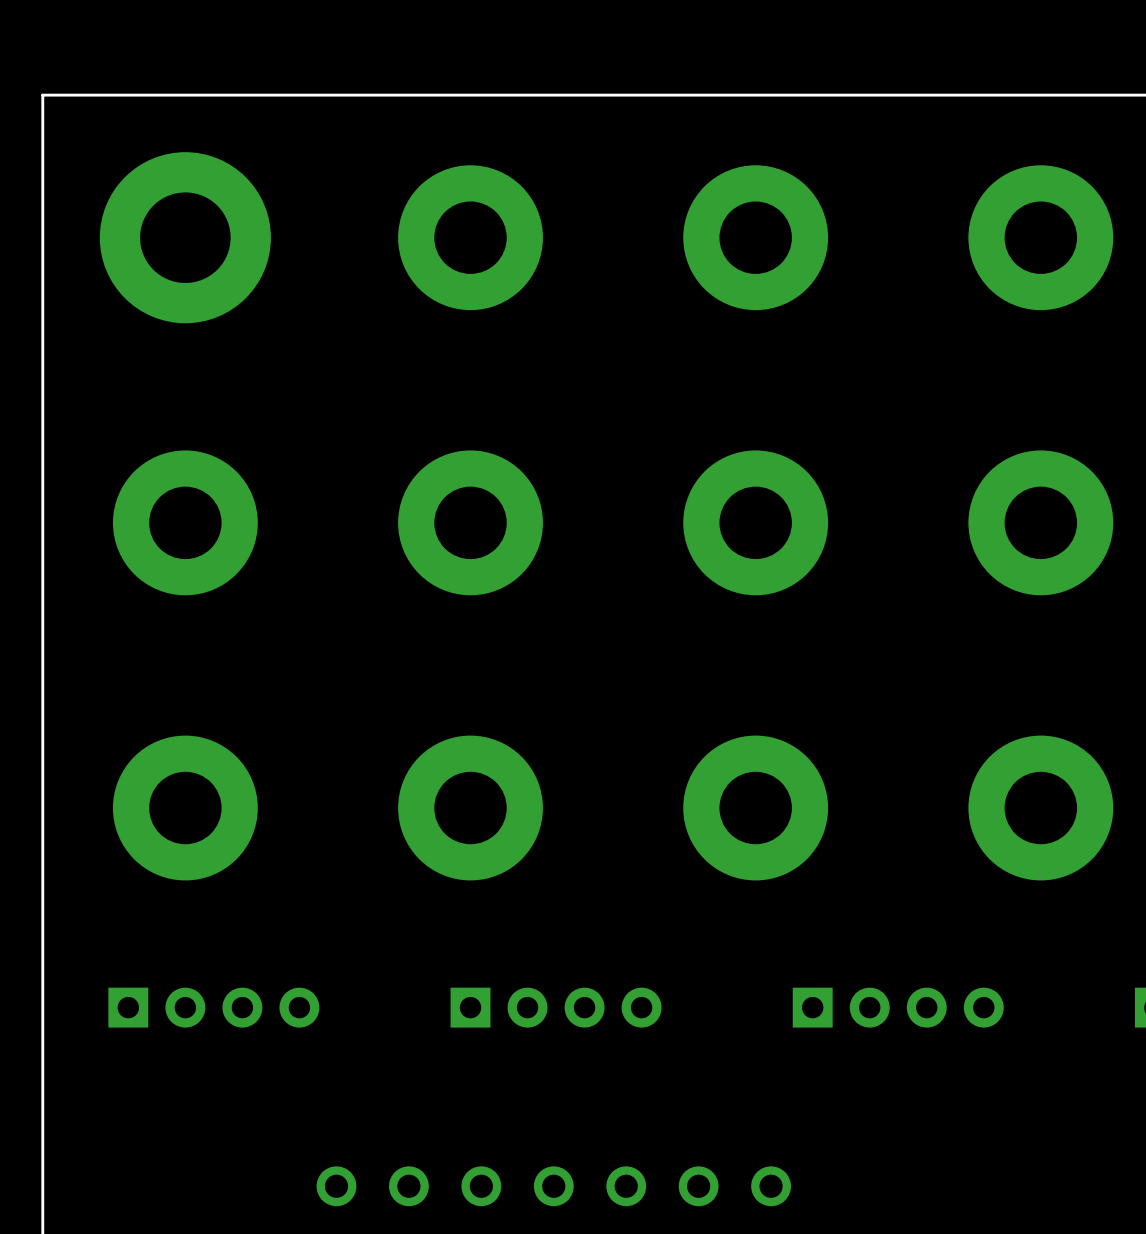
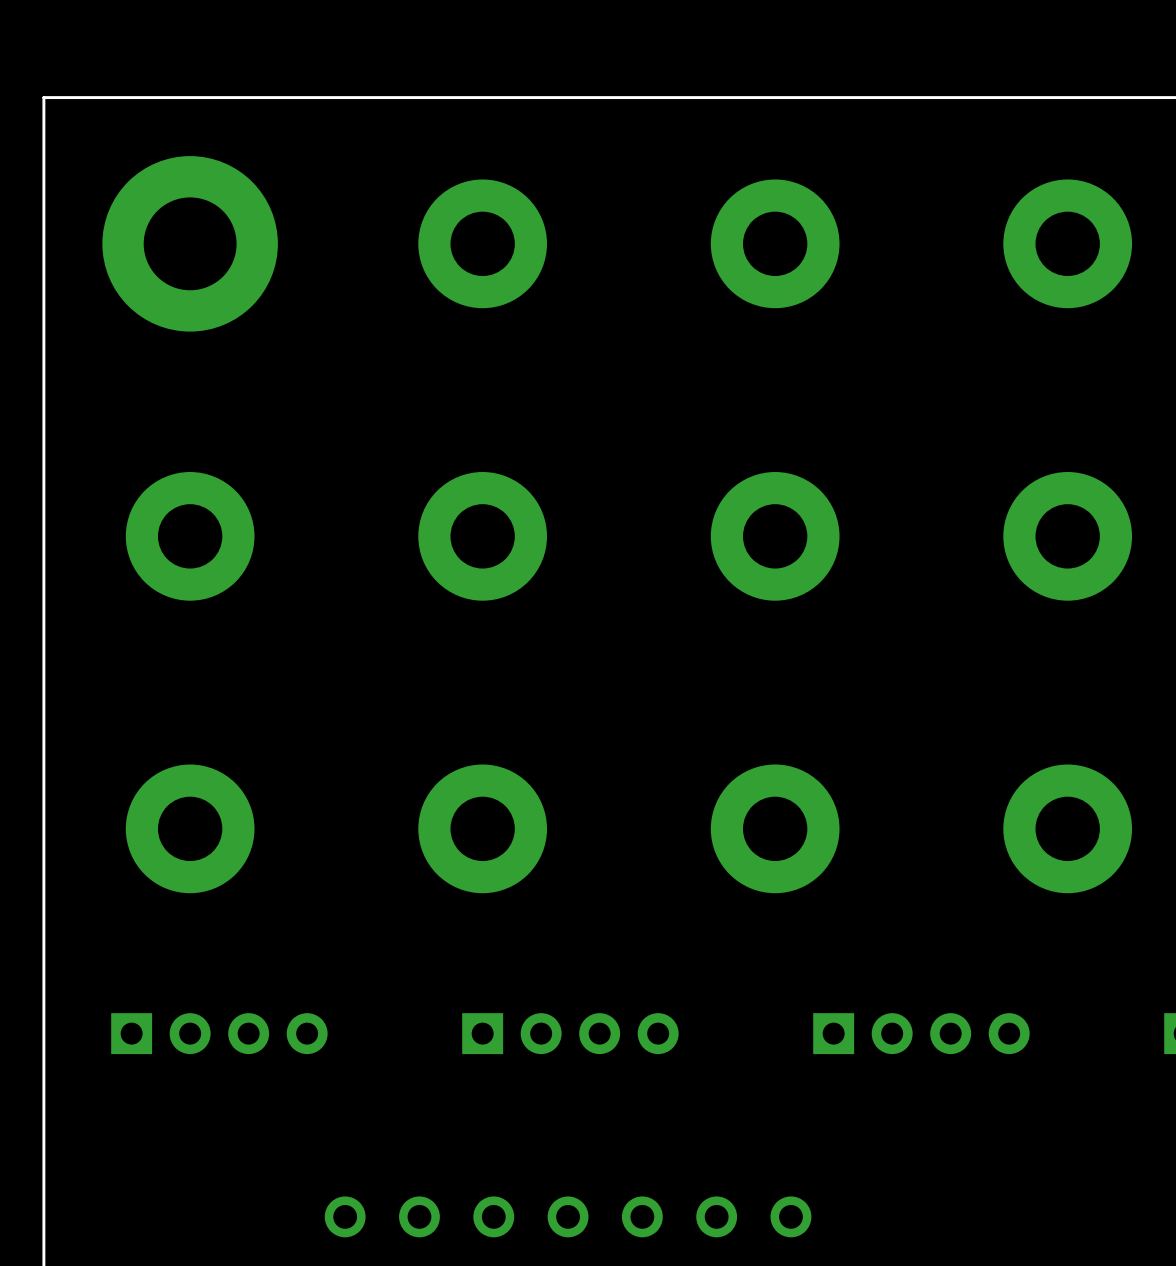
part footprint: [398, 165, 543, 311] -> [418, 179, 548, 309]
part footprint: [683, 165, 829, 311] -> [710, 179, 840, 309]
part footprint: [968, 165, 1114, 311] -> [1003, 179, 1133, 309]
part footprint: [112, 450, 258, 596] -> [125, 472, 255, 601]
part footprint: [398, 450, 543, 596] -> [418, 472, 548, 601]
part footprint: [683, 450, 829, 596] -> [710, 472, 840, 601]
part footprint: [968, 450, 1114, 596] -> [1003, 472, 1133, 601]
part footprint: [112, 735, 258, 881] -> [125, 764, 255, 894]
part footprint: [398, 735, 543, 881] -> [418, 764, 548, 894]
part footprint: [683, 735, 829, 881] -> [710, 764, 840, 894]
part footprint: [968, 735, 1114, 881] -> [1003, 764, 1133, 894]

